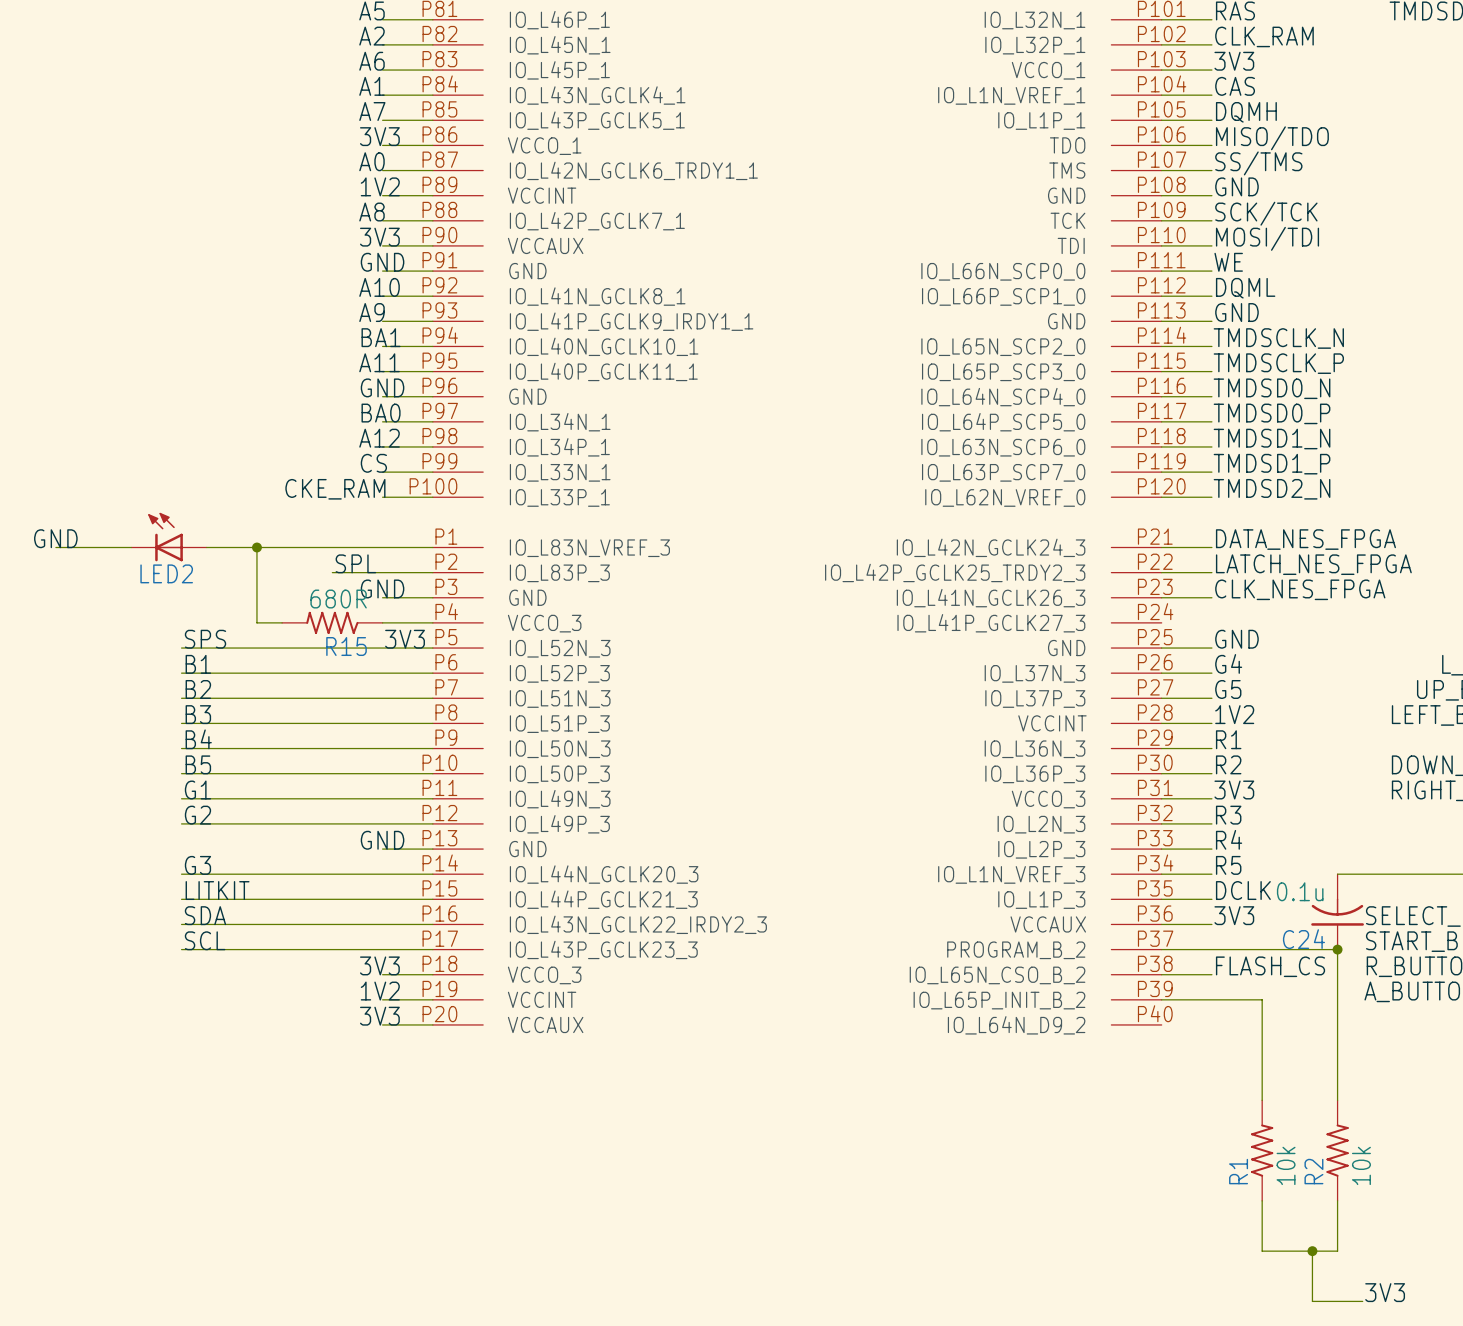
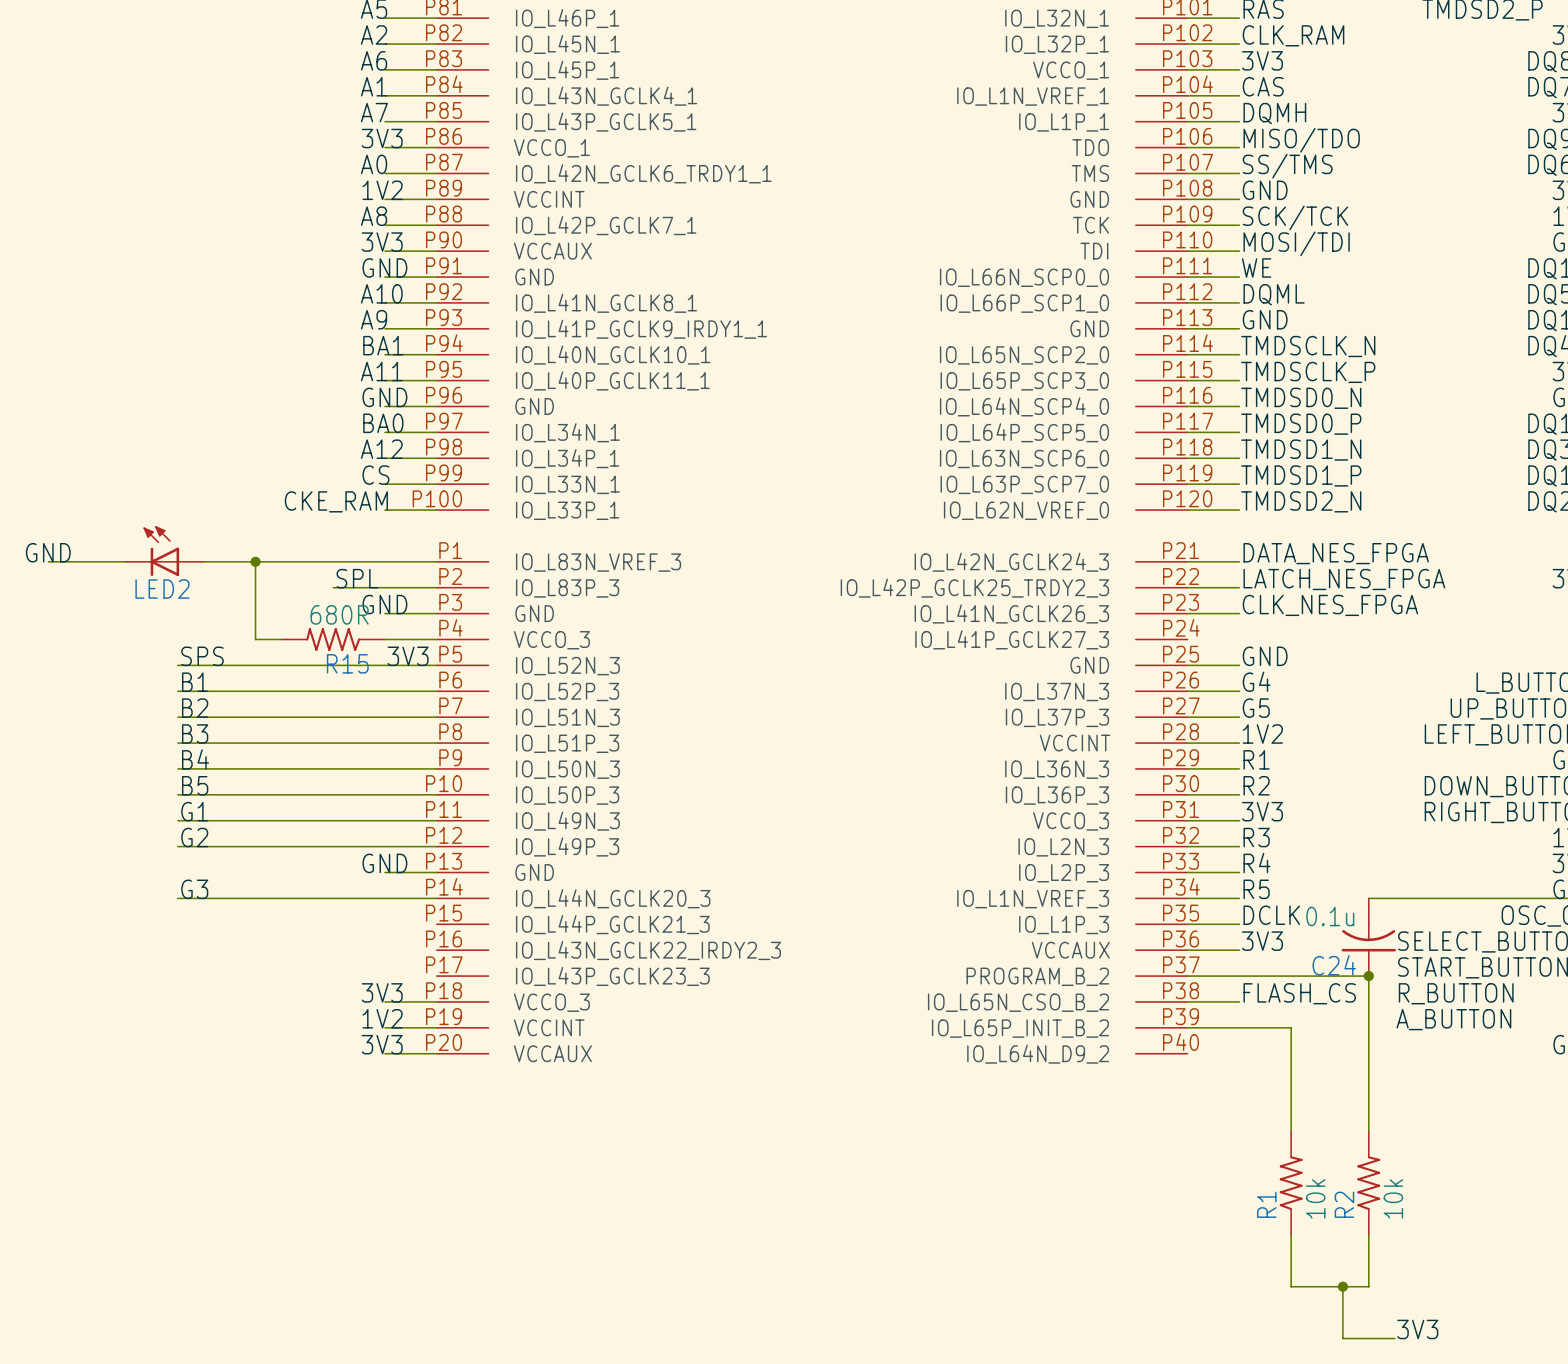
label: LITKIT (217, 890) -> none
wire: (181, 899) (432, 899) -> none
label: SDA (205, 915) -> none
wire: (181, 924) (432, 924) -> none
label: SCL (205, 940) -> none
wire: (181, 949) (432, 949) -> none

